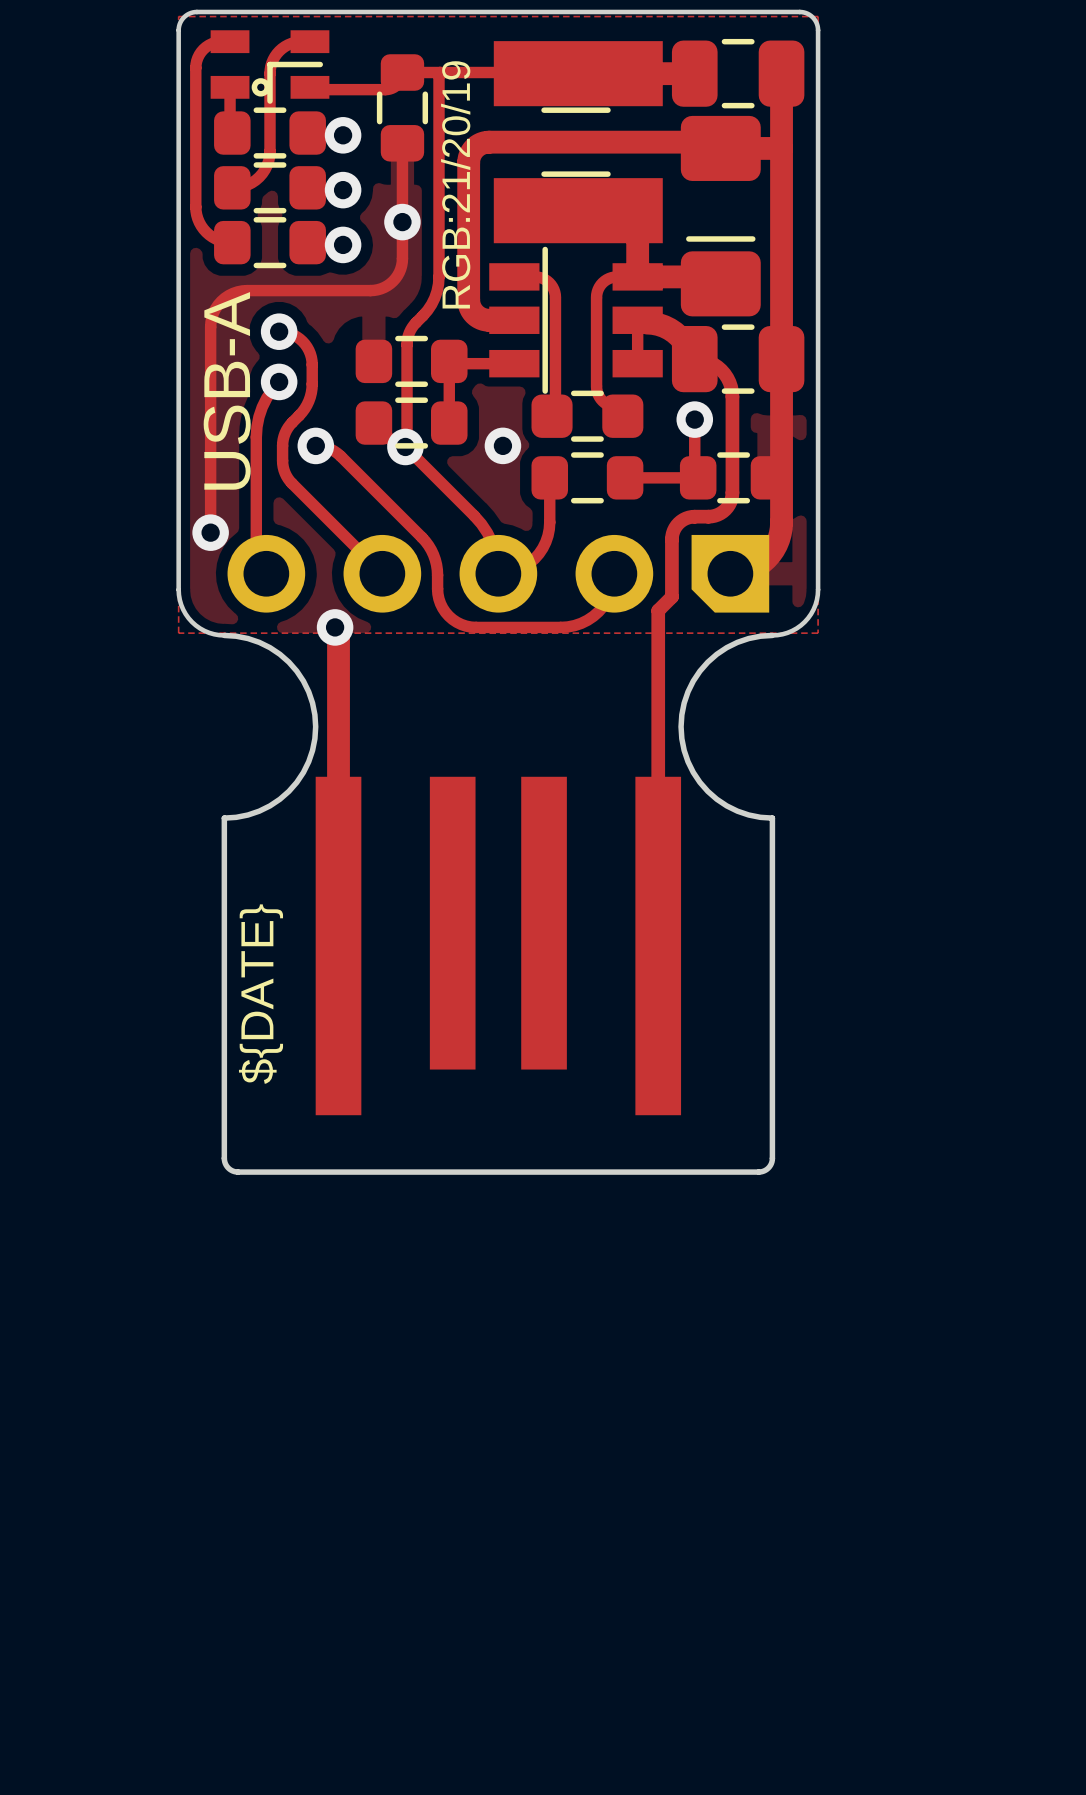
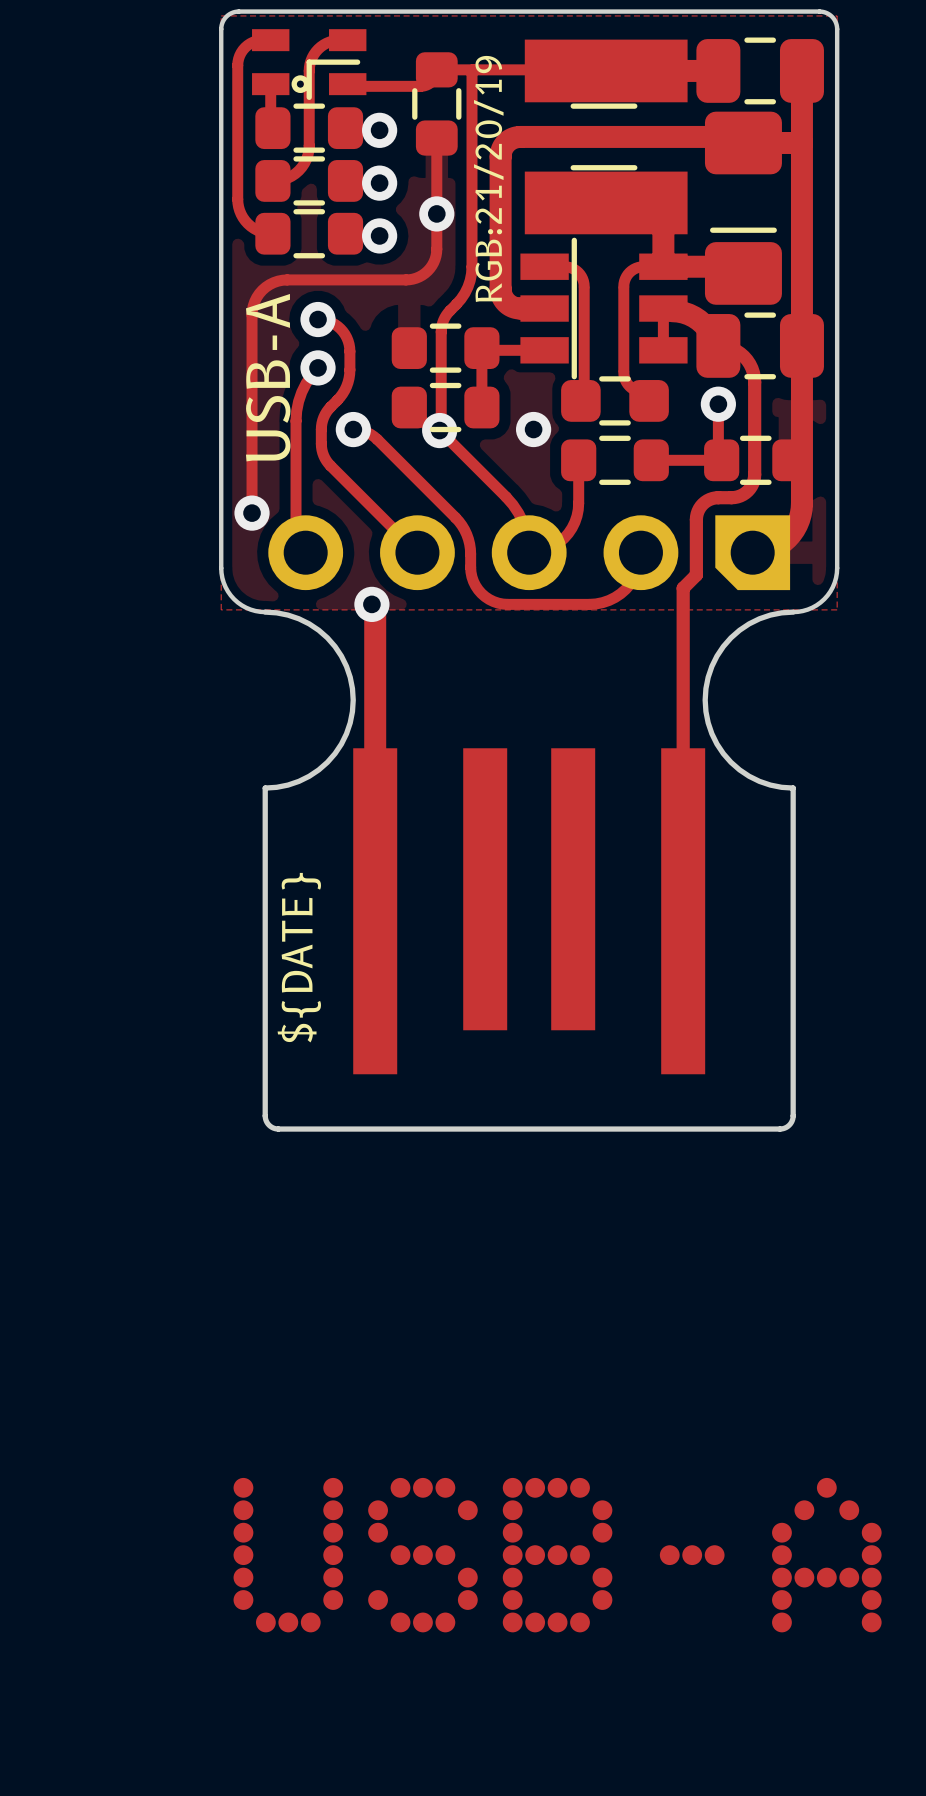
part: none -> (557, 1555)

